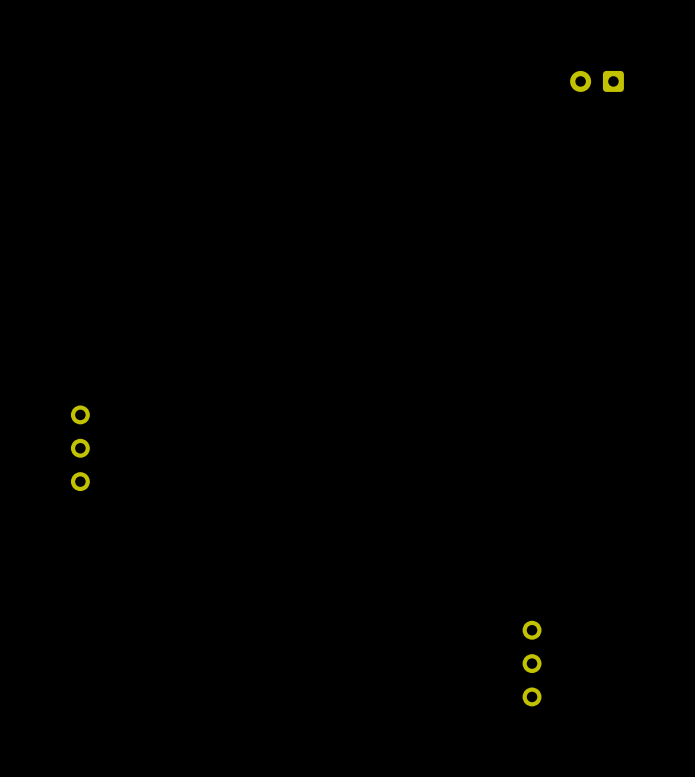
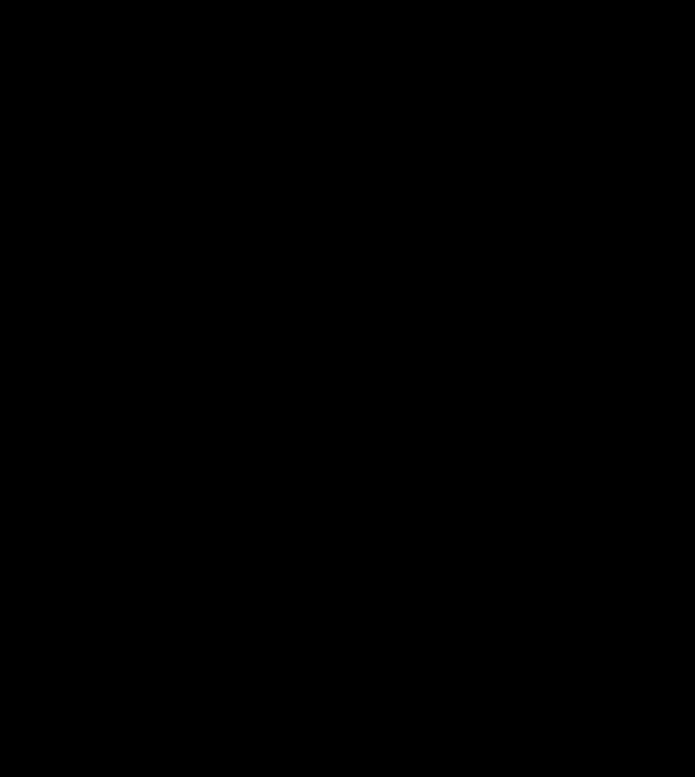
part: (597, 81) -> none
part: (80, 448) -> none
part: (532, 663) -> none

